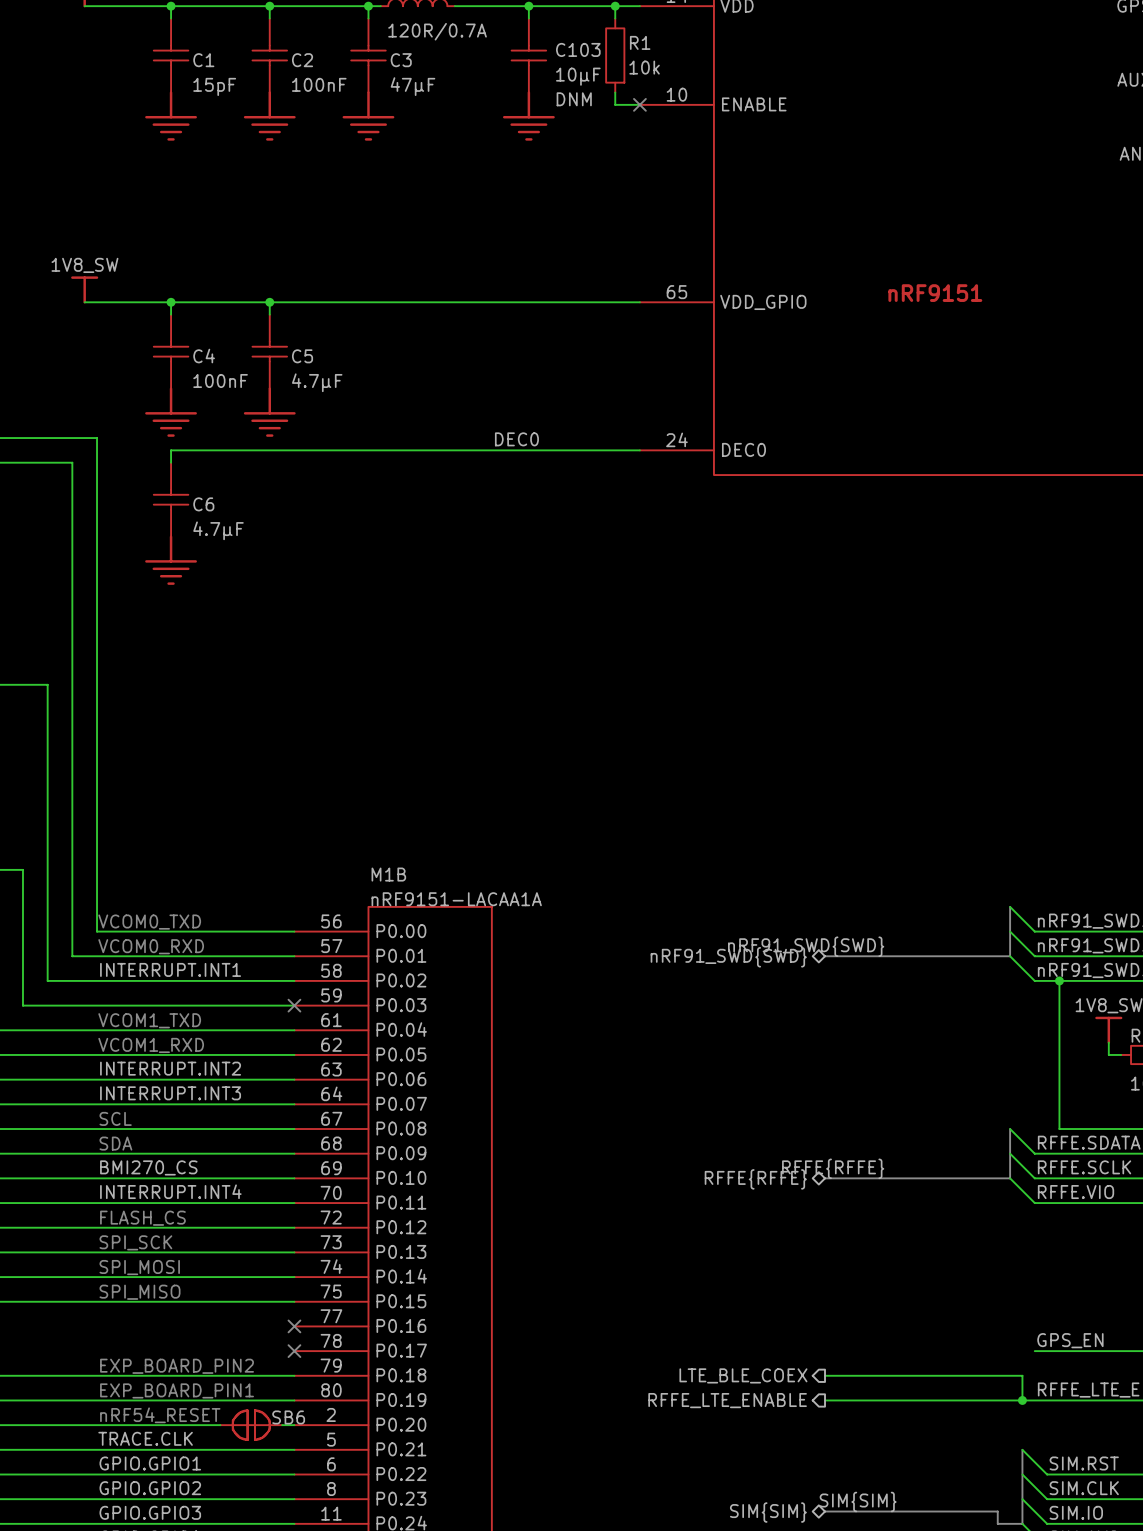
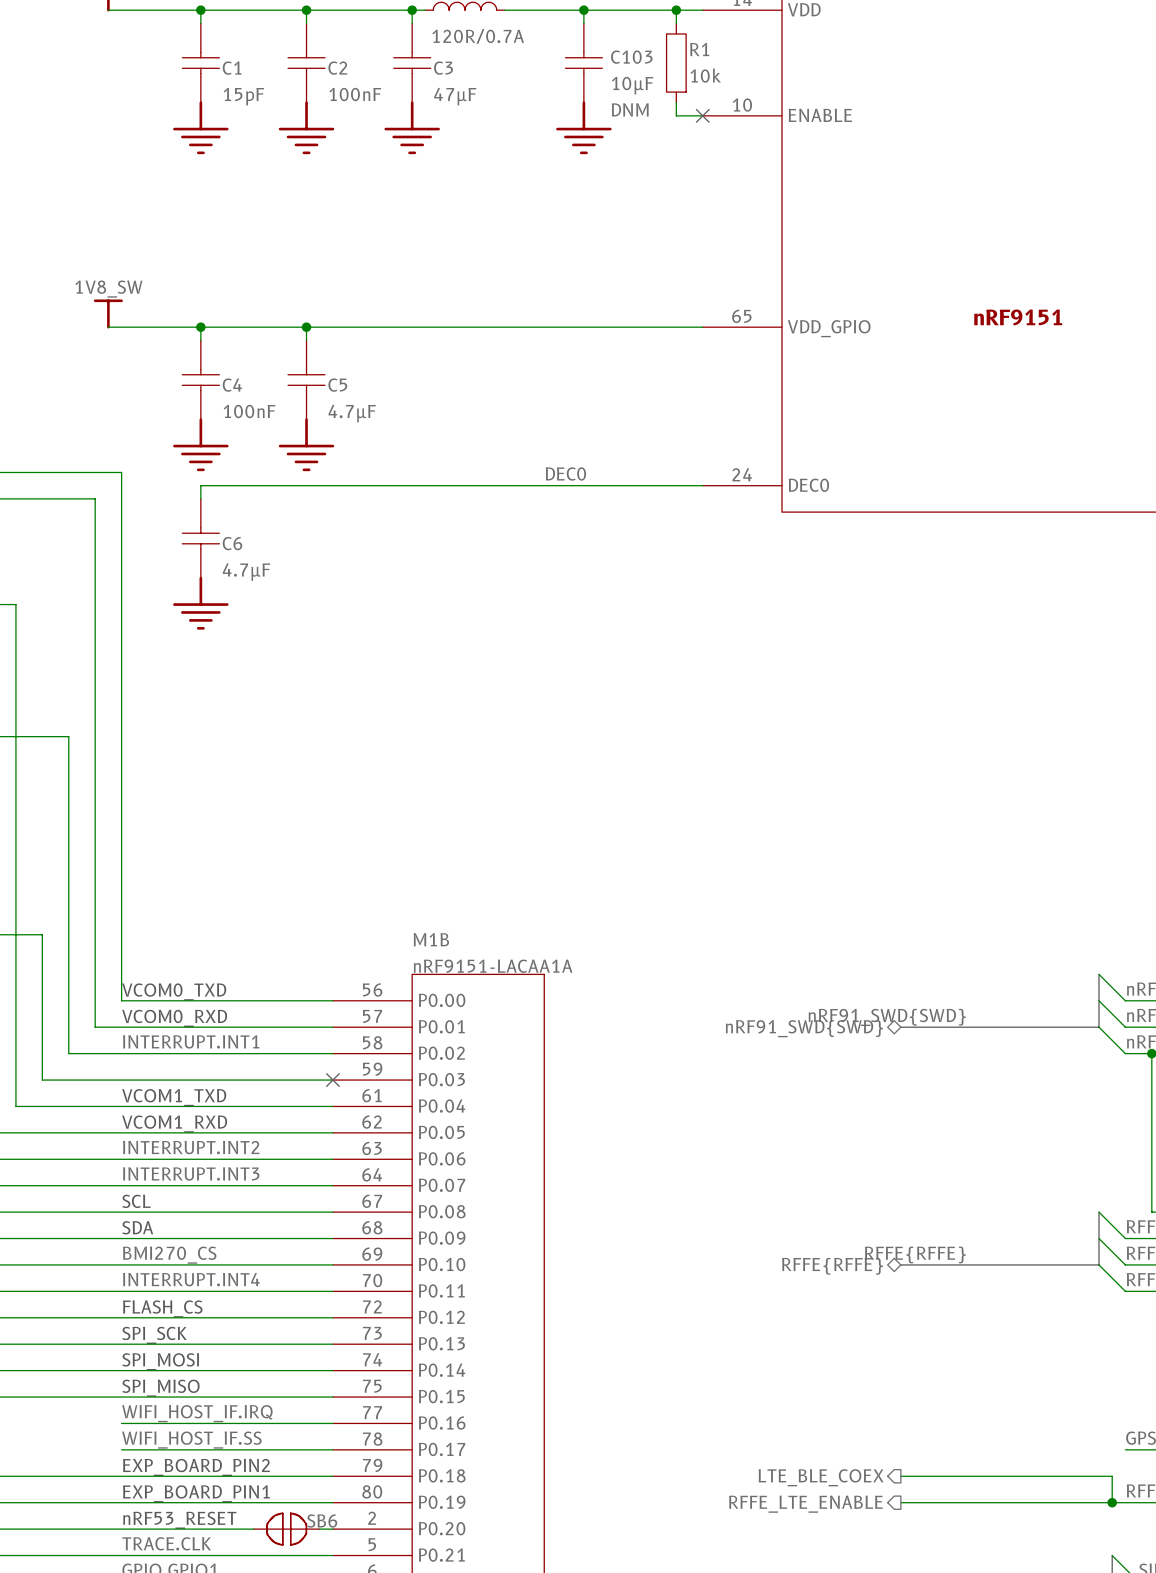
label: none -> WIFI_HOST_IF.IRQ (197, 1413)
wire: none -> (121, 1423) (332, 1423)
no-connect mark: (294, 1326) -> none
label: none -> WIFI_HOST_IF.SS (191, 1440)
wire: none -> (121, 1449) (332, 1449)
no-connect mark: (294, 1351) -> none
text: nRF54_RESET (160, 1415) -> nRF53_RESET (179, 1520)

